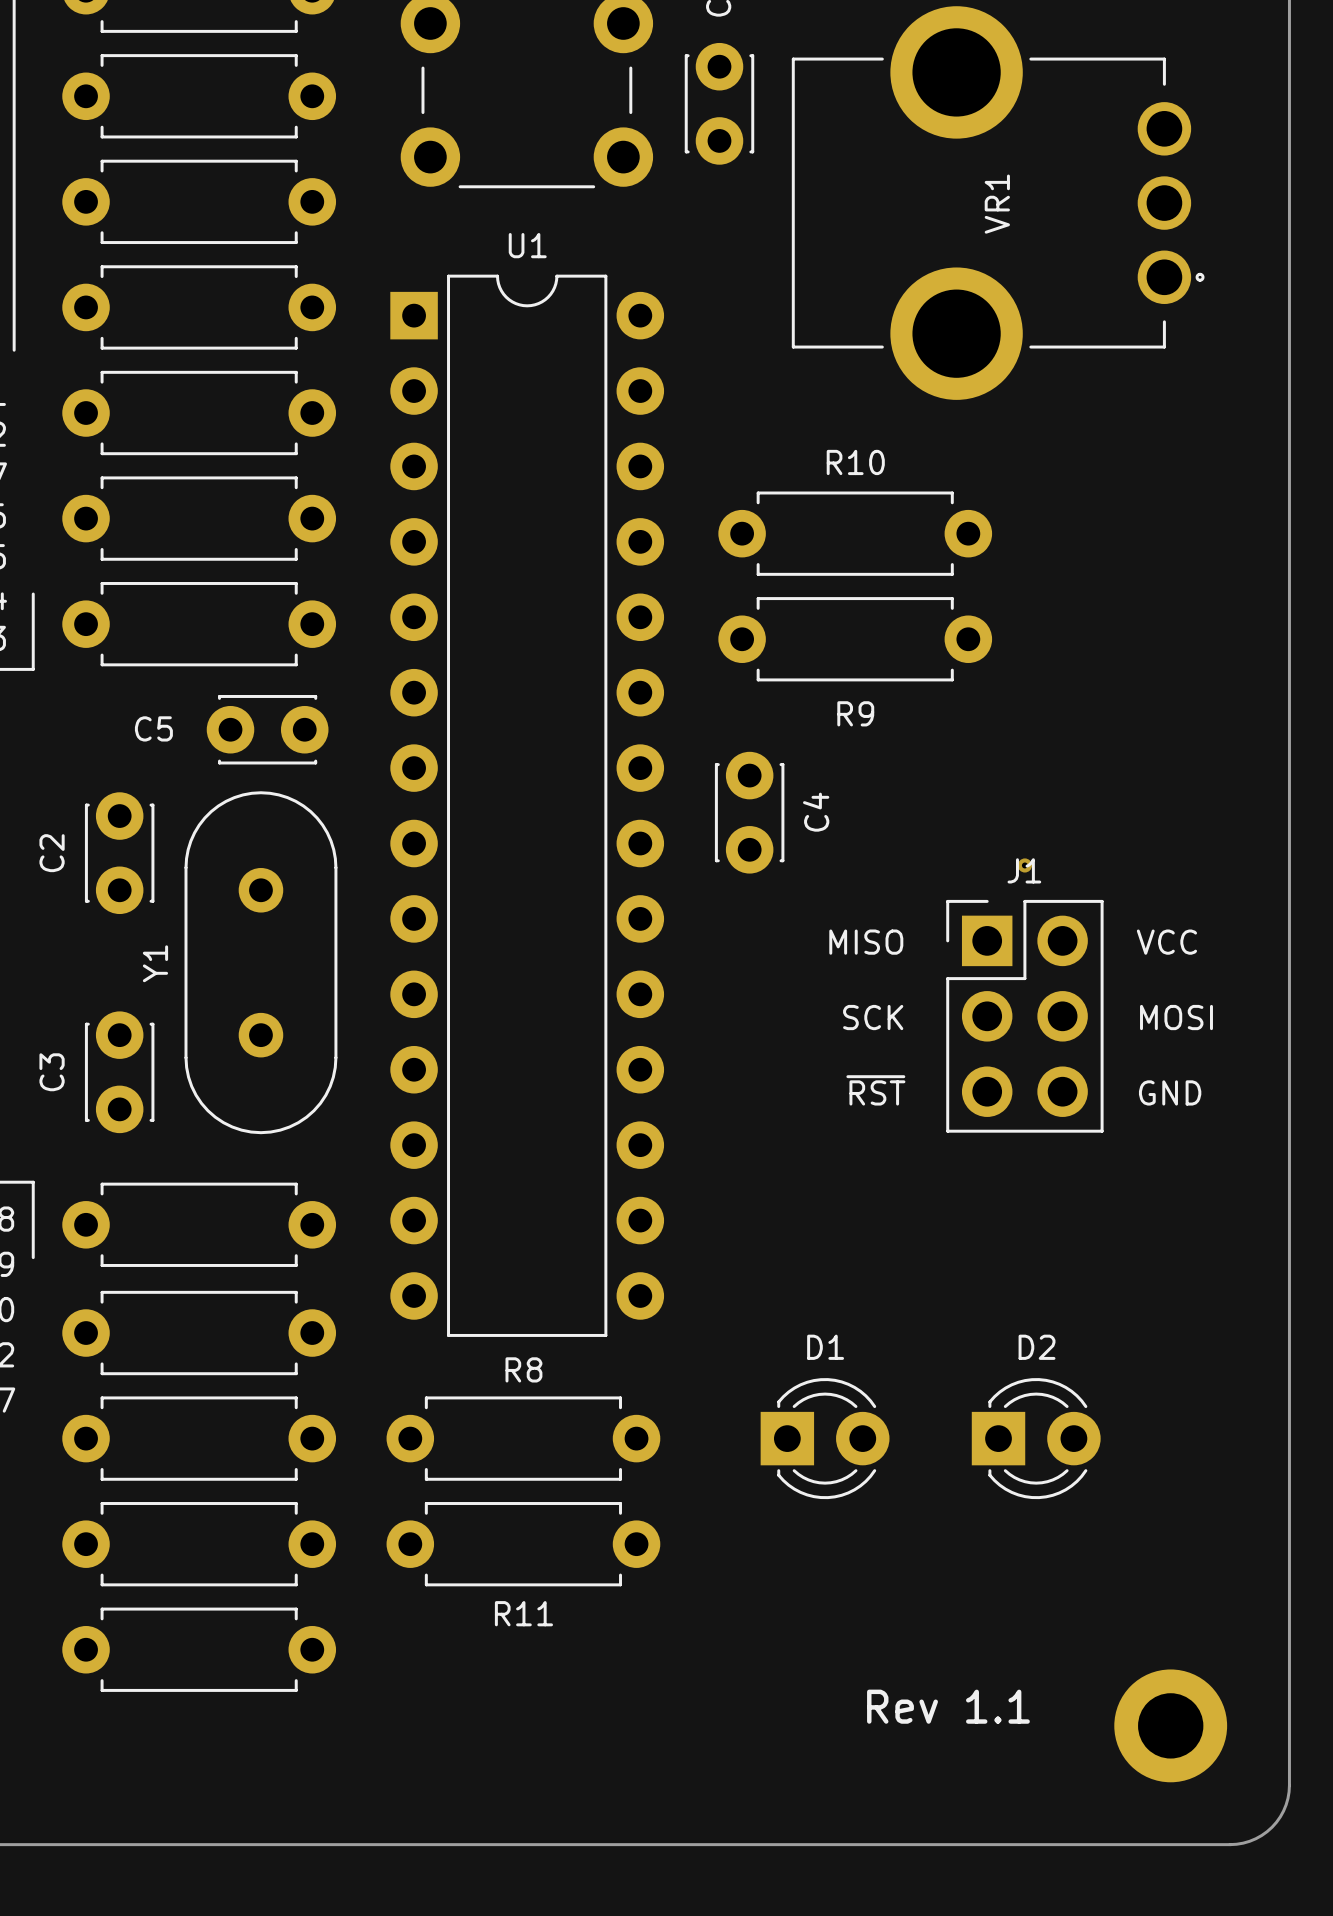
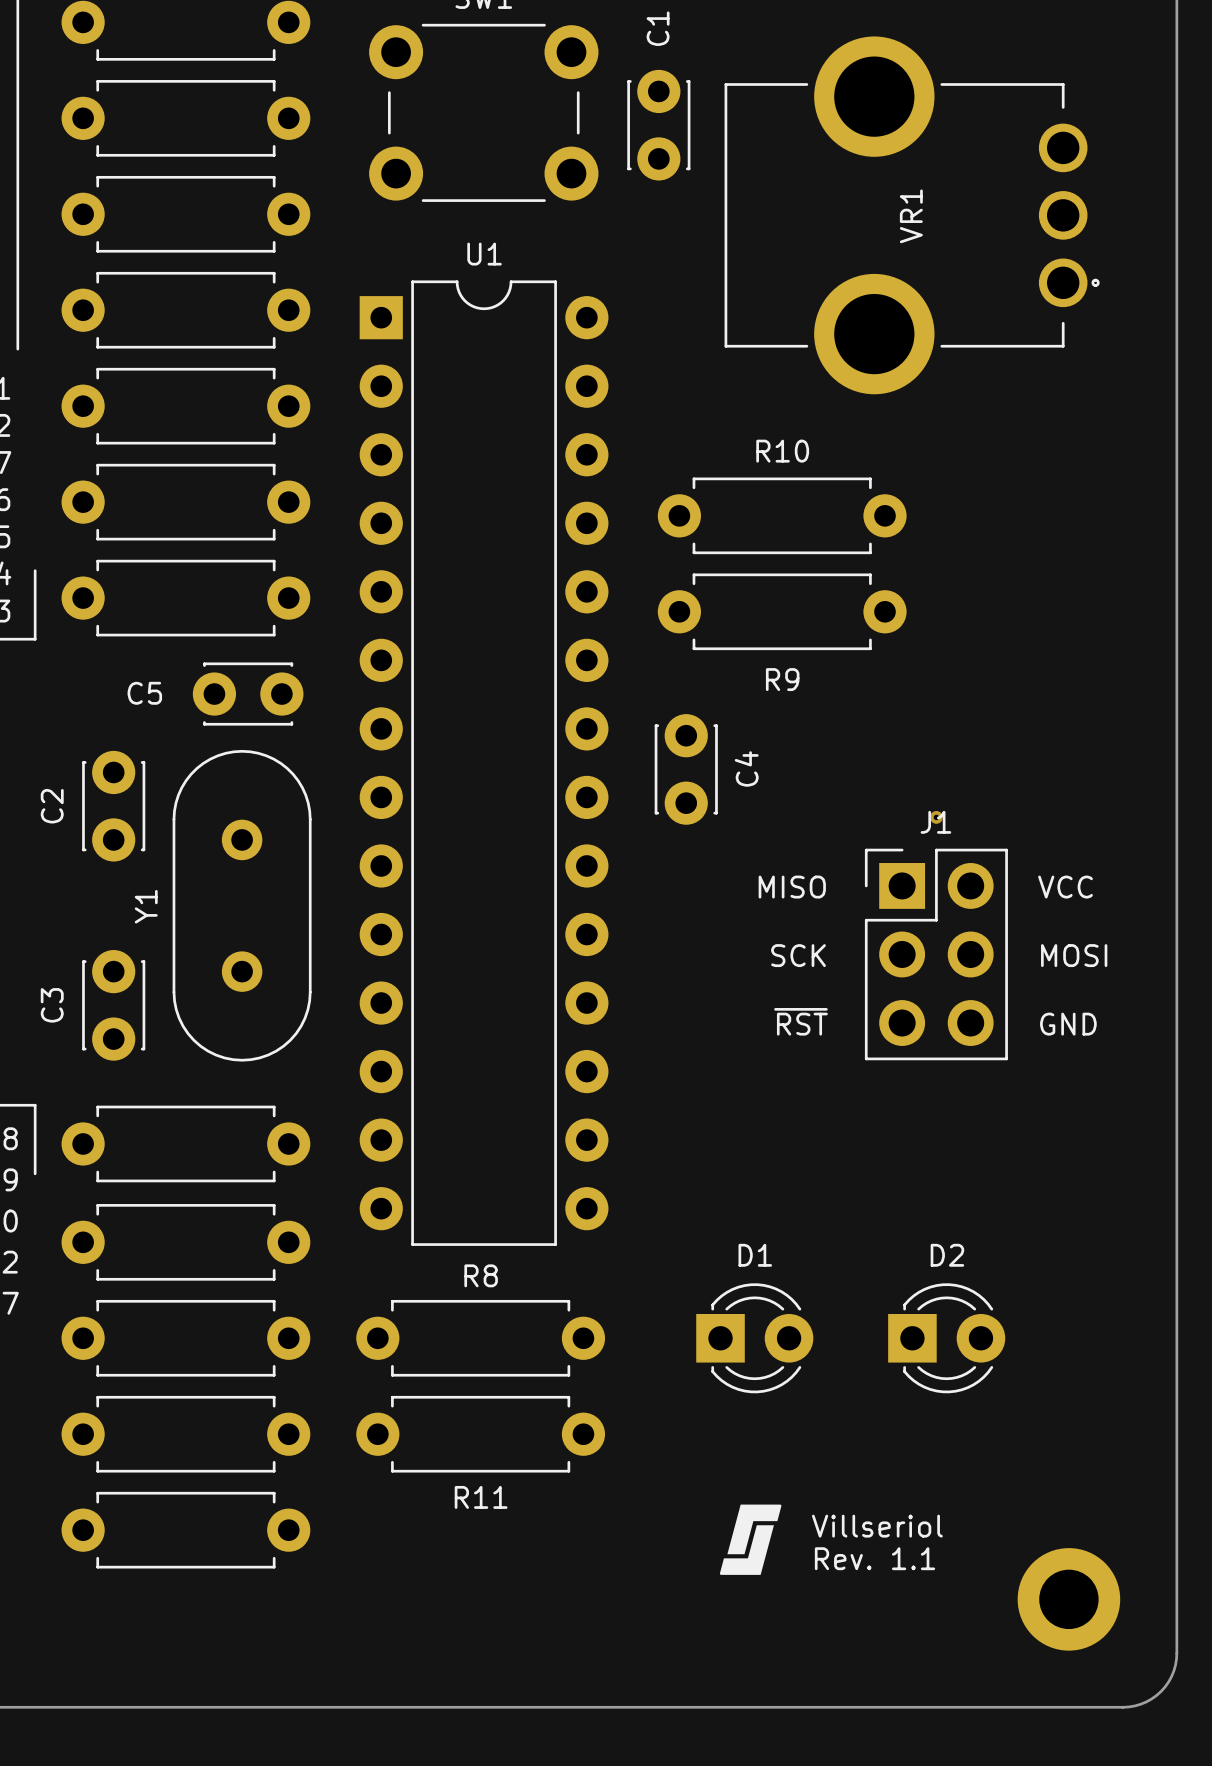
drawing: none -> [719, 1504, 782, 1575]
text: none -> Villseriol (877, 1526)
text: Rev 1.1 (948, 1706) -> Rev. 1.1 (874, 1558)

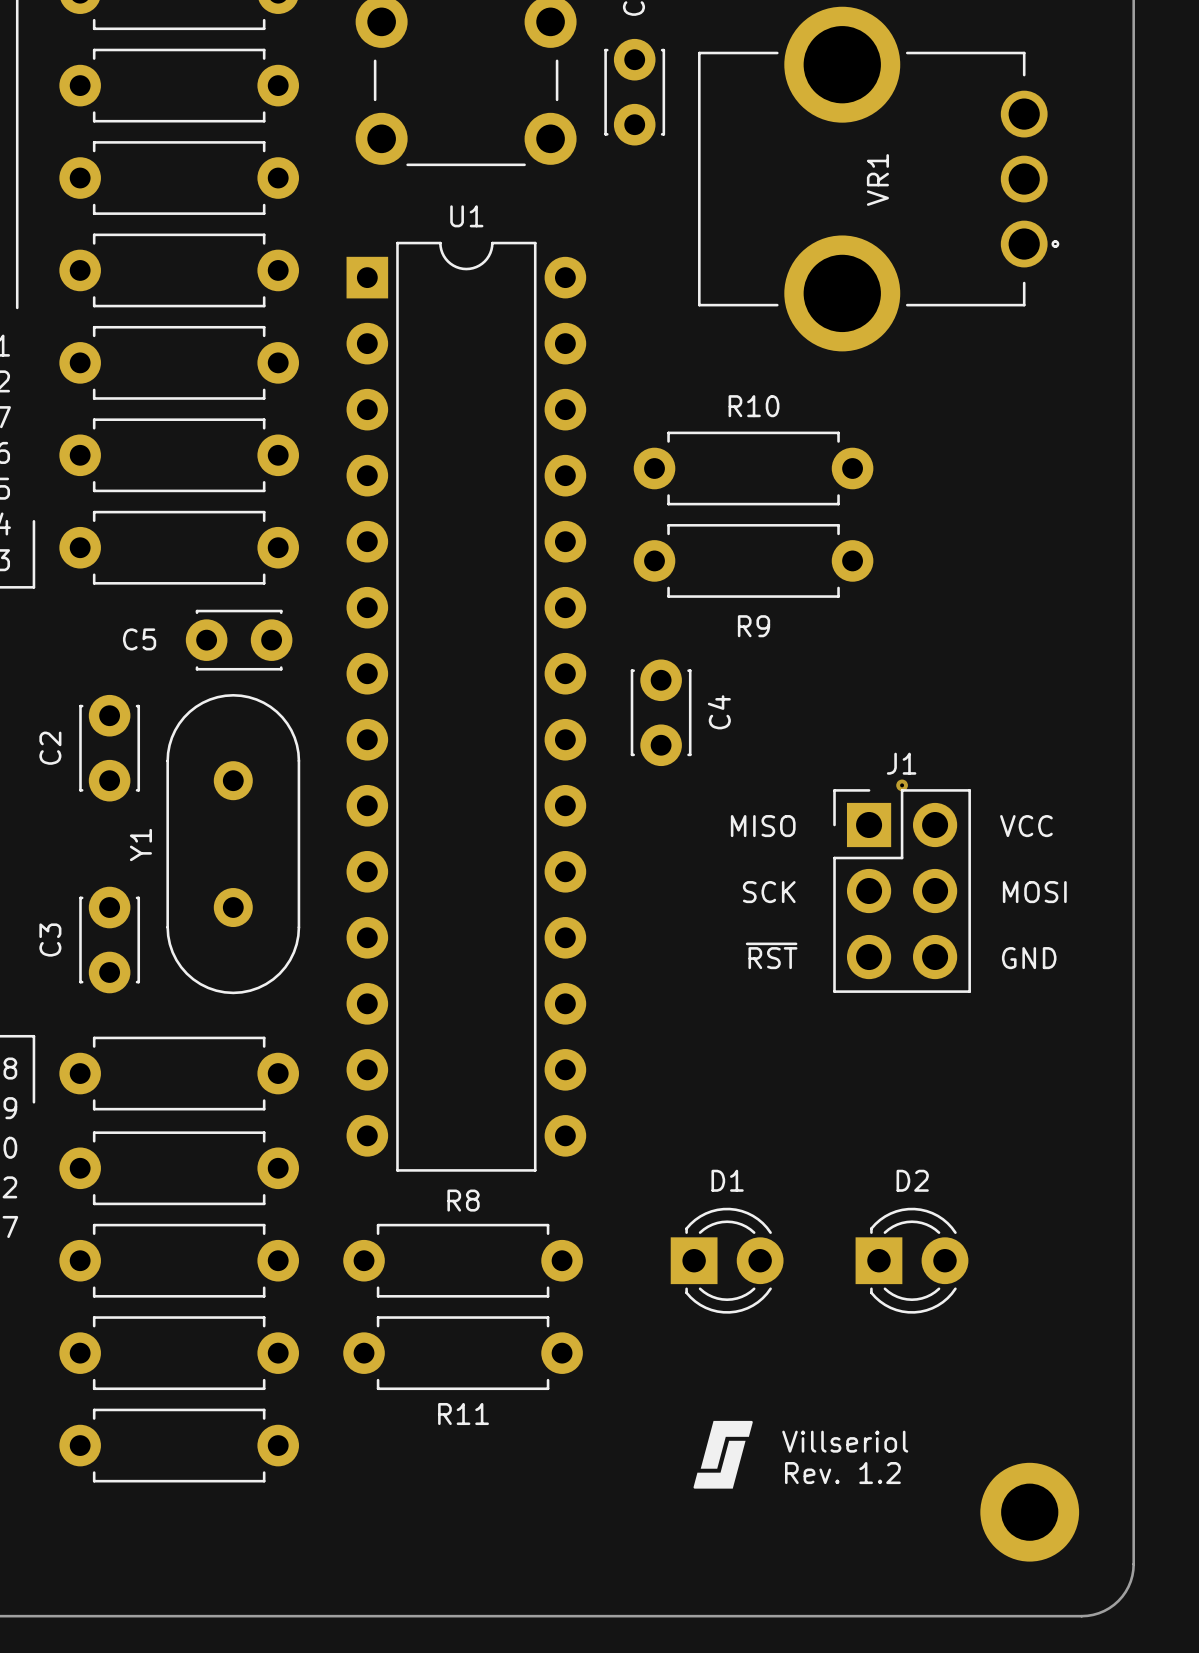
via: (936, 817) -> none
via: none -> (902, 785)
text: Rev. 1.1 (874, 1558) -> Rev. 1.2 (842, 1473)

